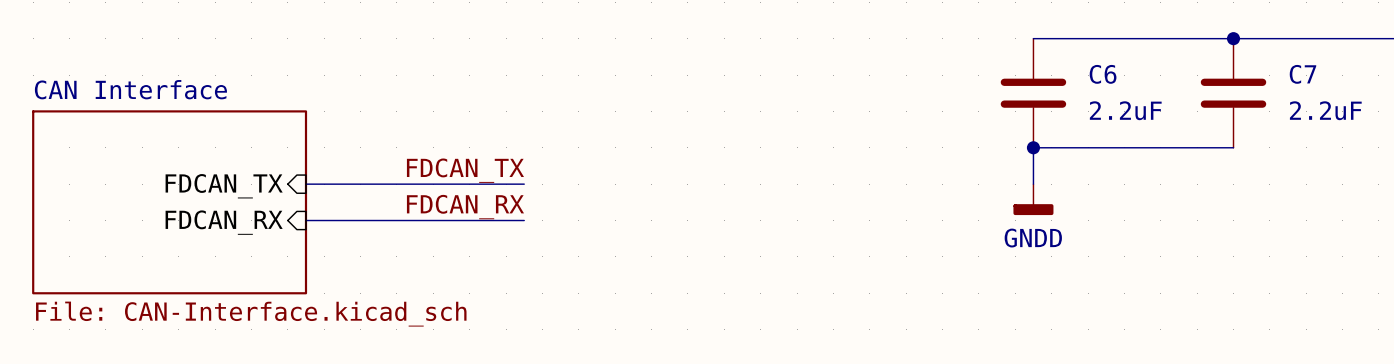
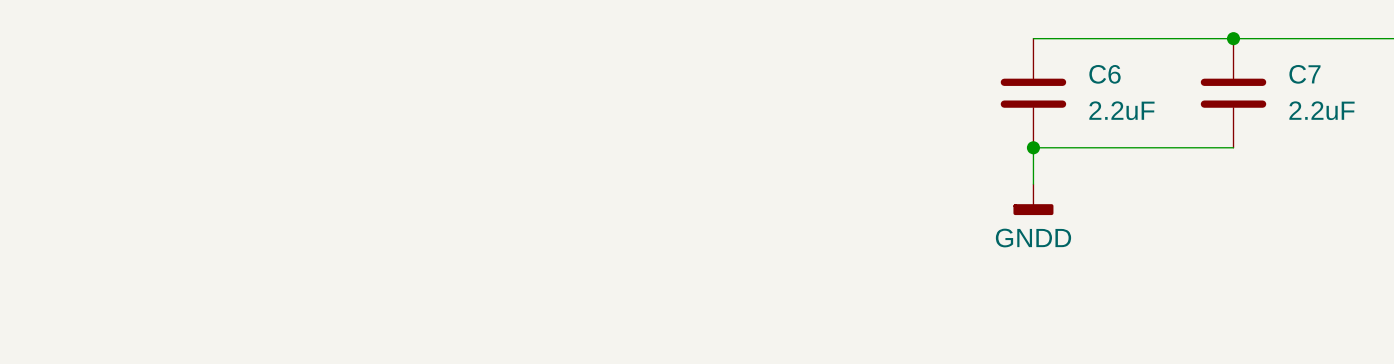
label: FDCAN_TX (465, 170) -> none
wire: (305, 184) (524, 184) -> none
sheet pin: FDCAN_TX (224, 186) -> none
sheet CAN Interface: File: CAN-Interface.kicad_sch (169, 202) -> none
label: FDCAN_RX (465, 207) -> none
wire: (305, 220) (524, 220) -> none
sheet pin: FDCAN_RX (224, 222) -> none

